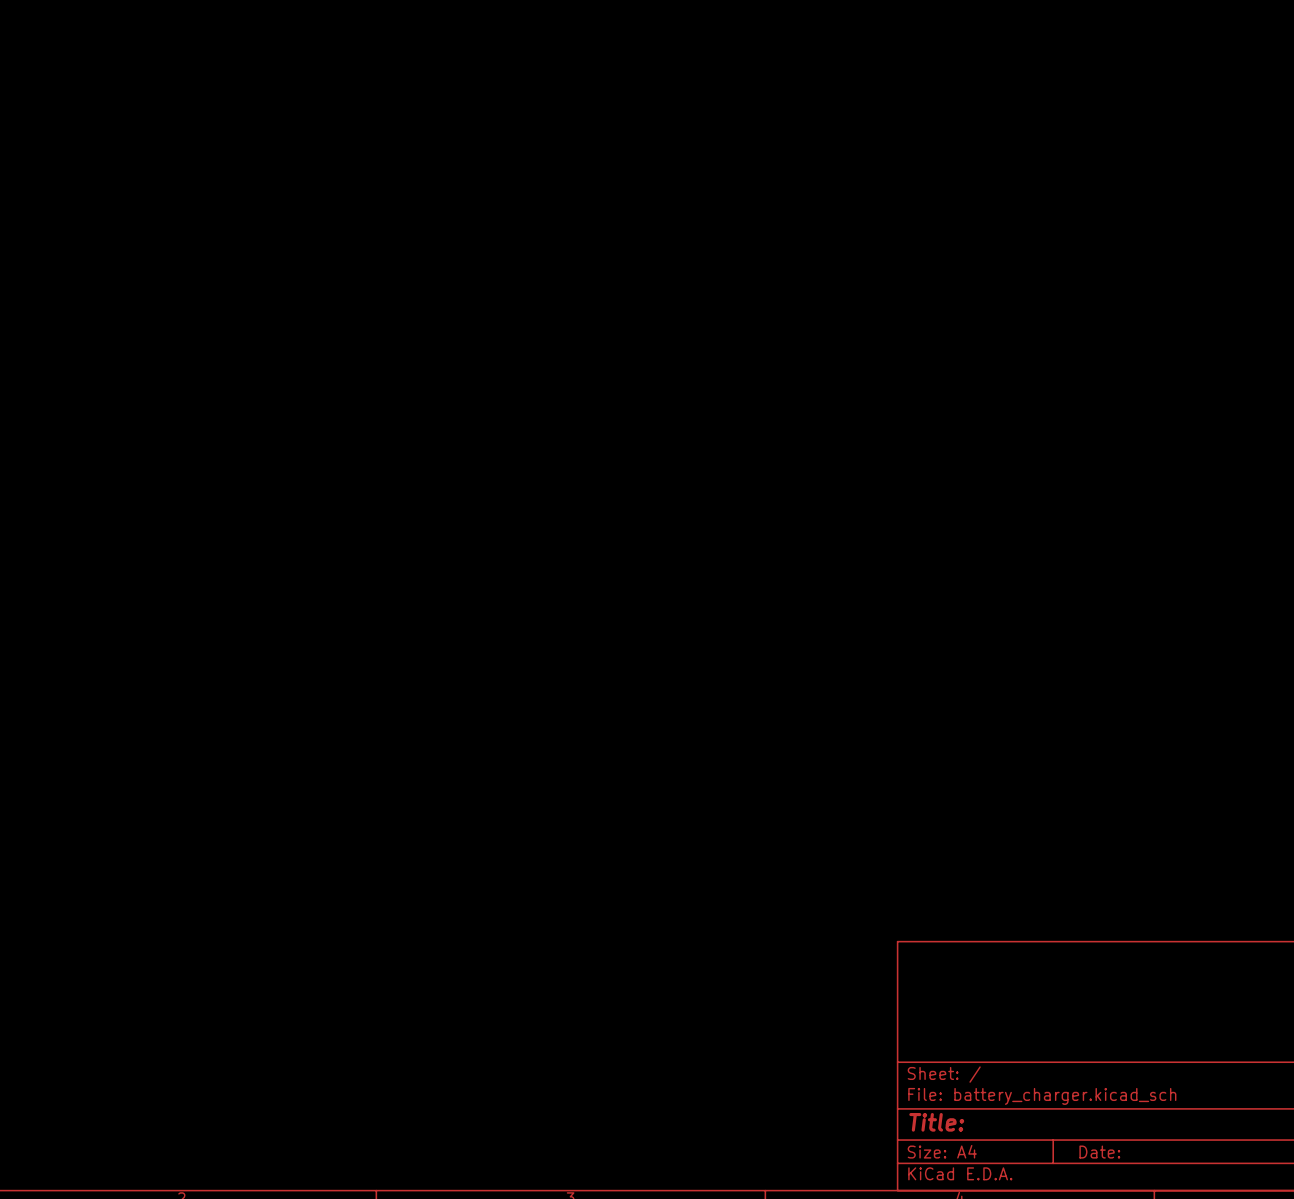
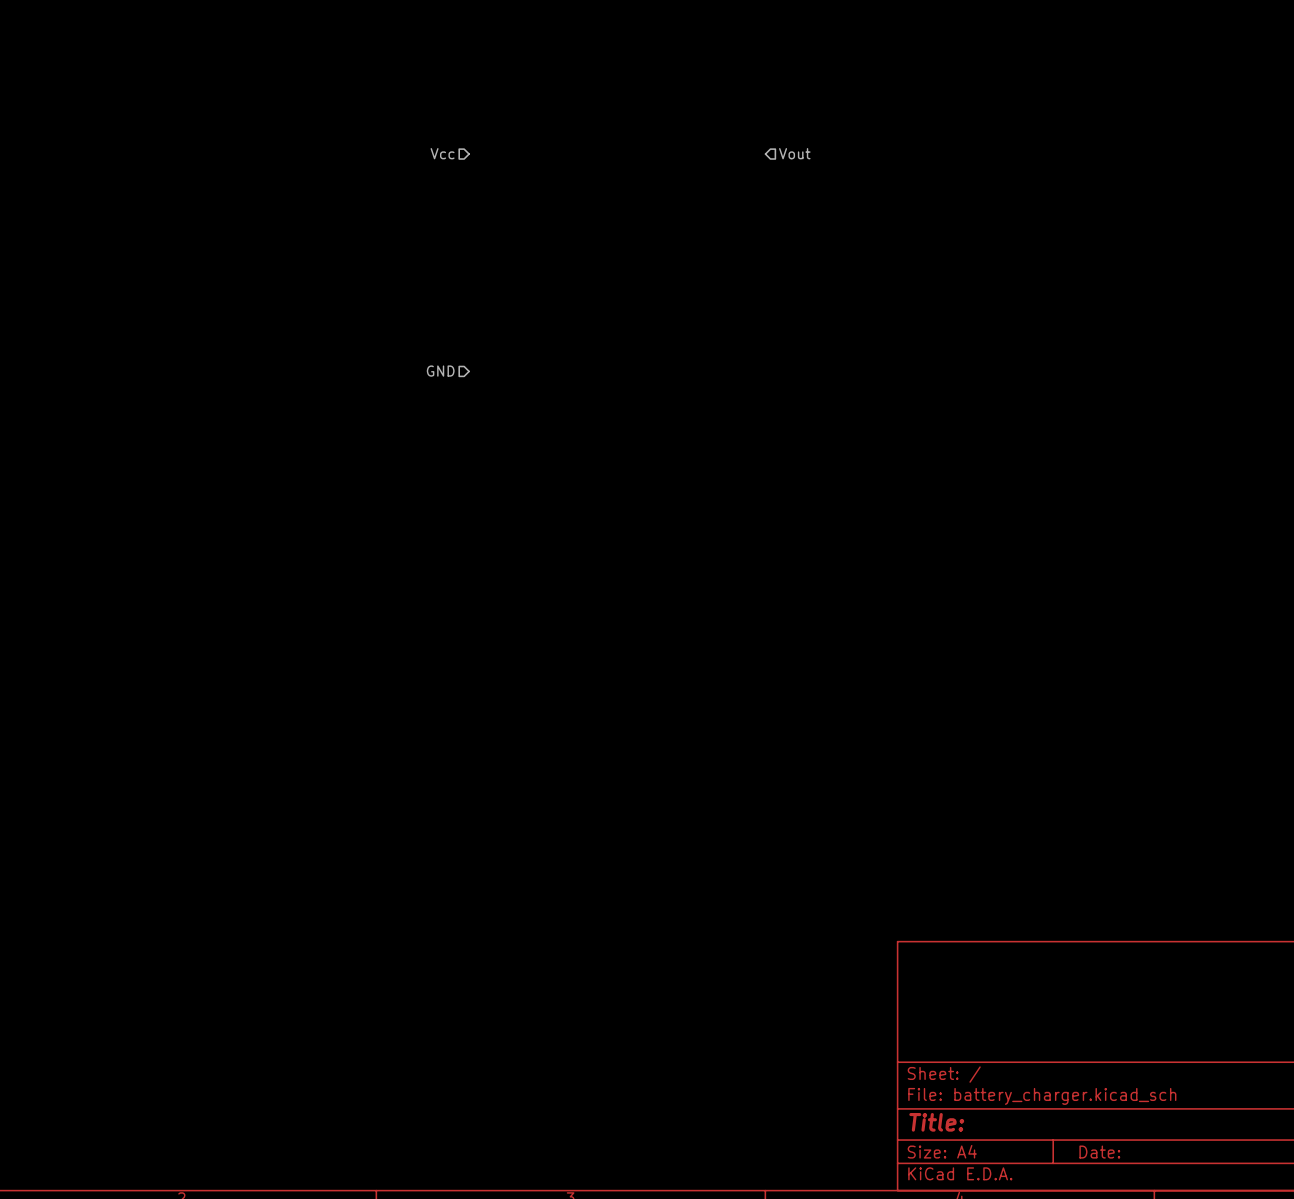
hierarchical label: none -> Vcc (442, 153)
hierarchical label: none -> Vout (794, 153)
hierarchical label: none -> GND (440, 371)

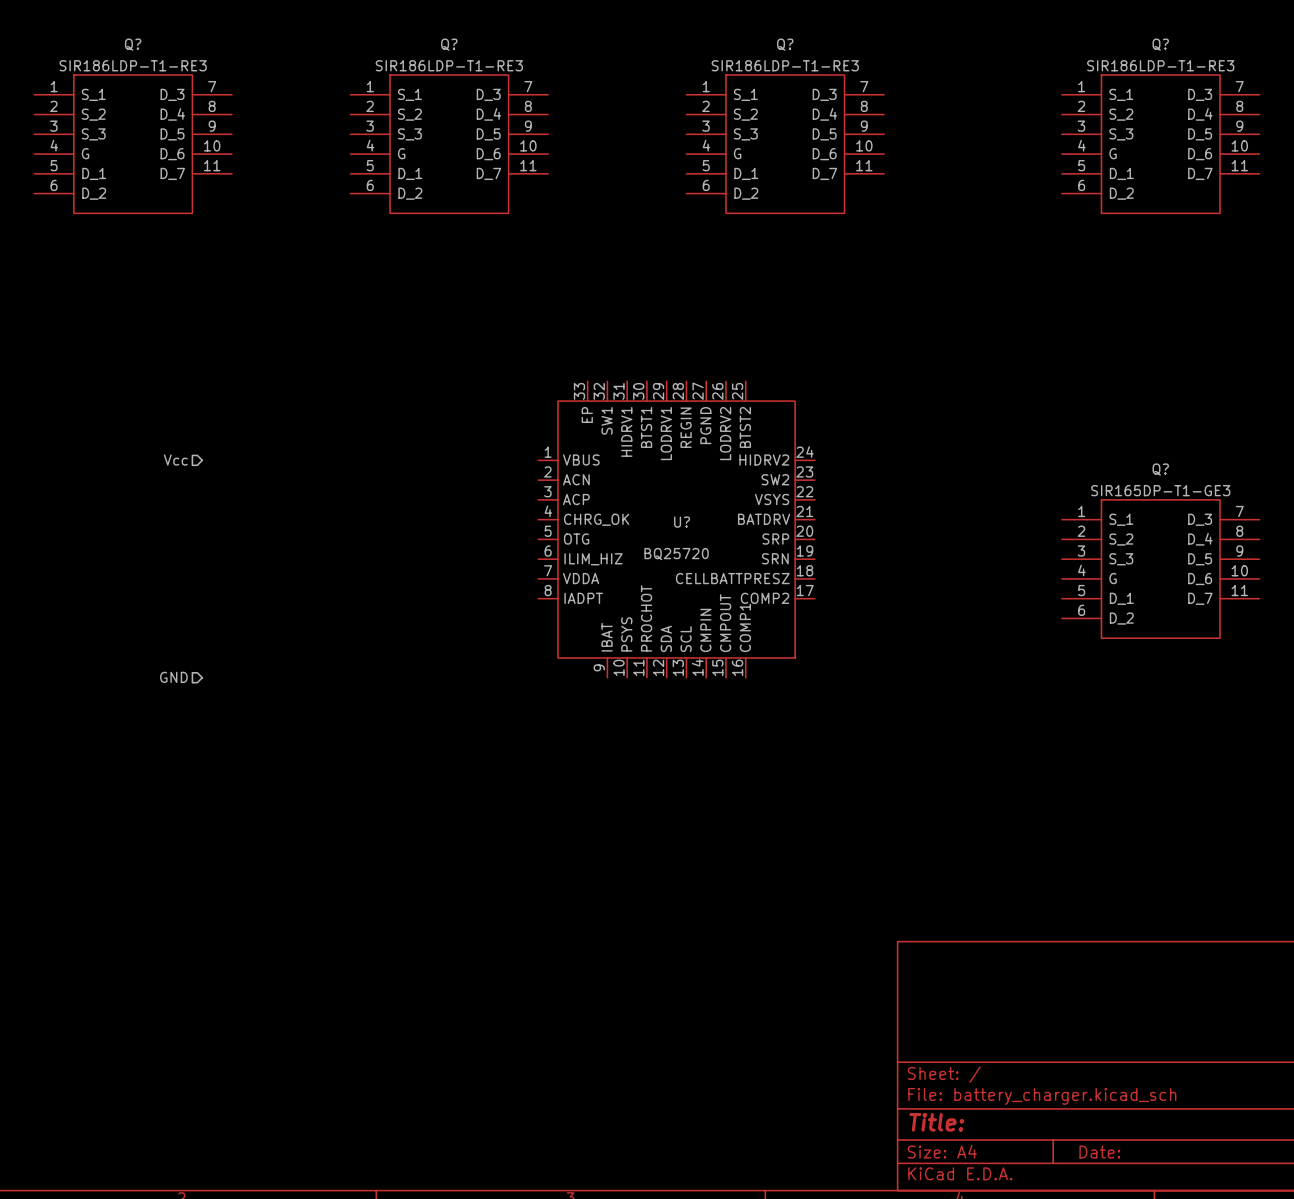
Q?: none -> SIR186LDP-T1-RE3 (133, 144)
Q?: none -> SIR186LDP-T1-RE3 (449, 144)
Q?: none -> SIR186LDP-T1-RE3 (785, 144)
Q?: none -> SIR186LDP-T1-RE3 (1160, 144)
hierarchical label: Vcc (442, 153) -> none
hierarchical label: Vout (794, 153) -> none
hierarchical label: GND (440, 371) -> none
hierarchical label: none -> Vcc (175, 459)
U?: none -> BQ25720 (676, 529)
Q?: none -> SIR165DP-T1-GE3 (1160, 569)
hierarchical label: none -> GND (173, 677)

